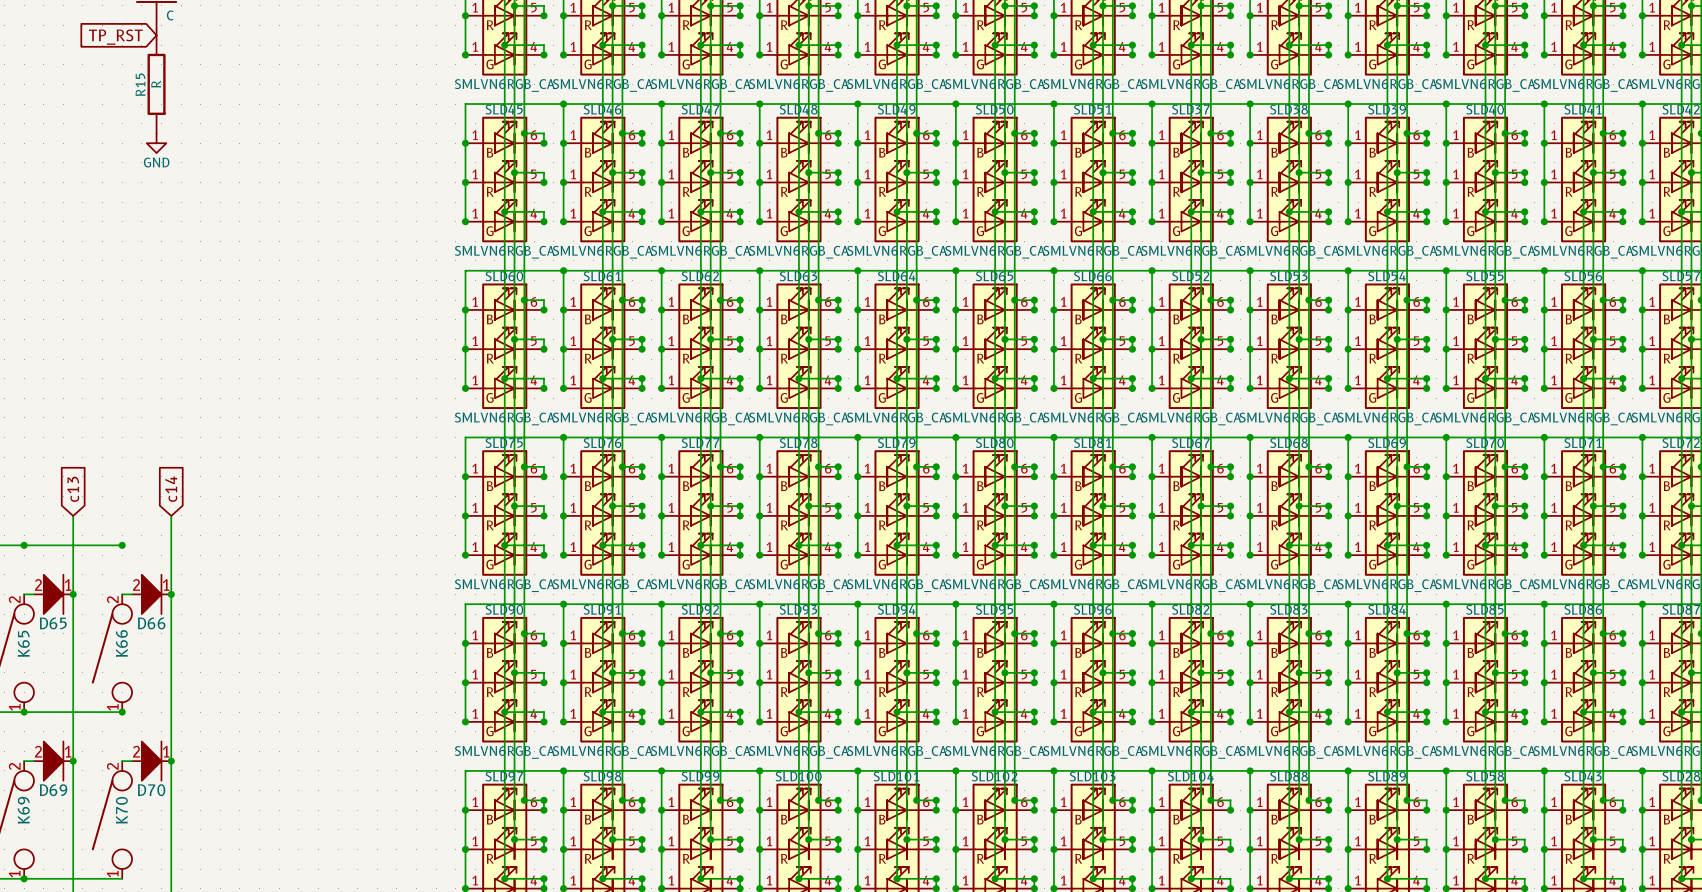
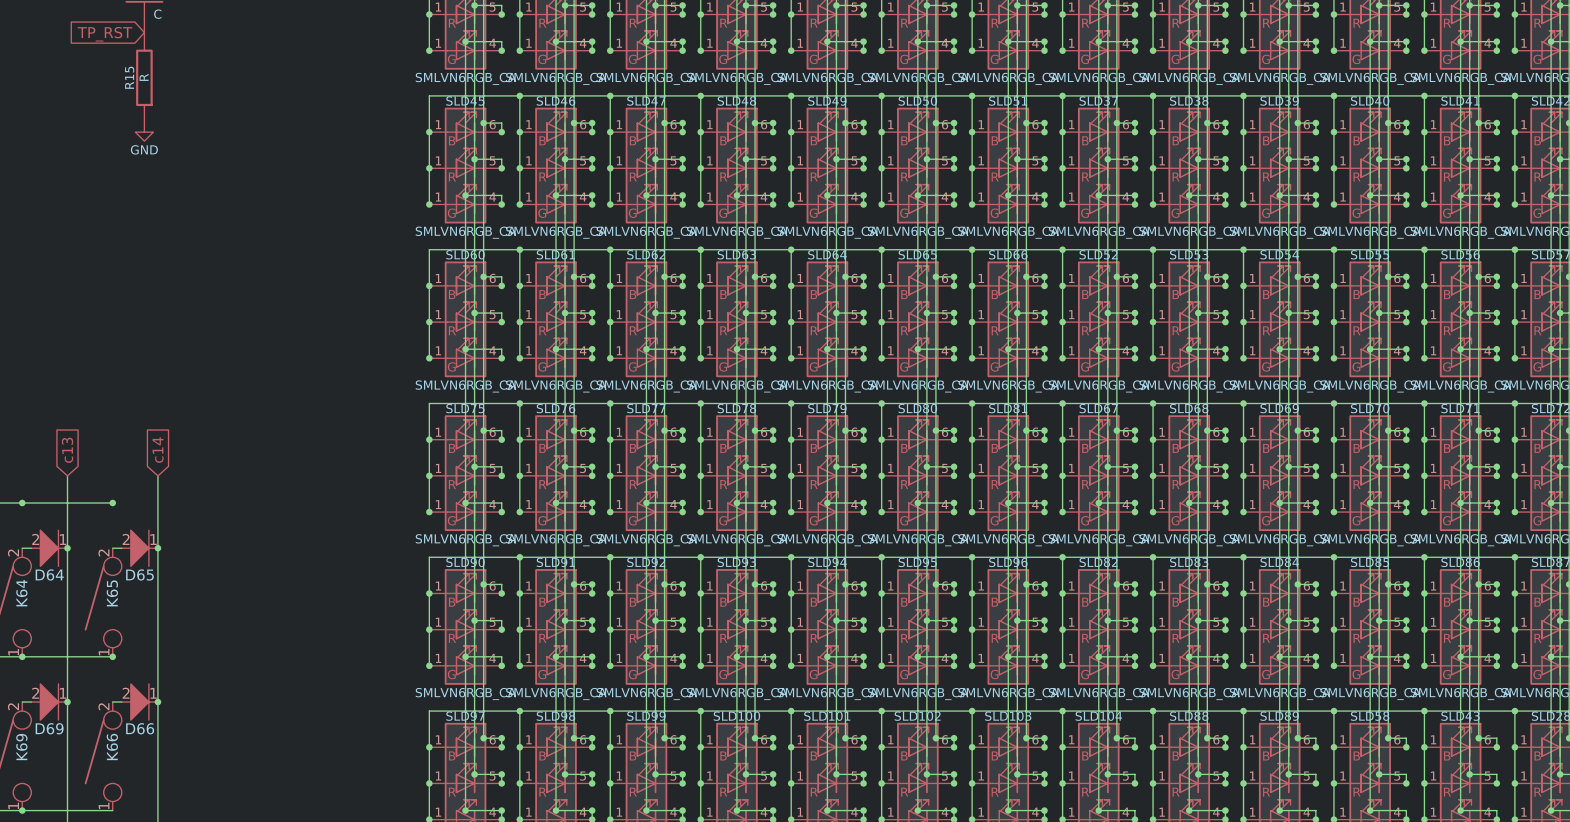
D65 name: D65 (53, 623) -> D64 (49, 574)
D66 name: D66 (151, 623) -> D65 (139, 574)
K65 name: K65 (23, 643) -> K64 (21, 593)
K66 name: K66 (121, 643) -> K65 (112, 593)
D70 name: D70 (151, 790) -> D66 (140, 728)
K70 name: K70 (121, 810) -> K66 (112, 746)

